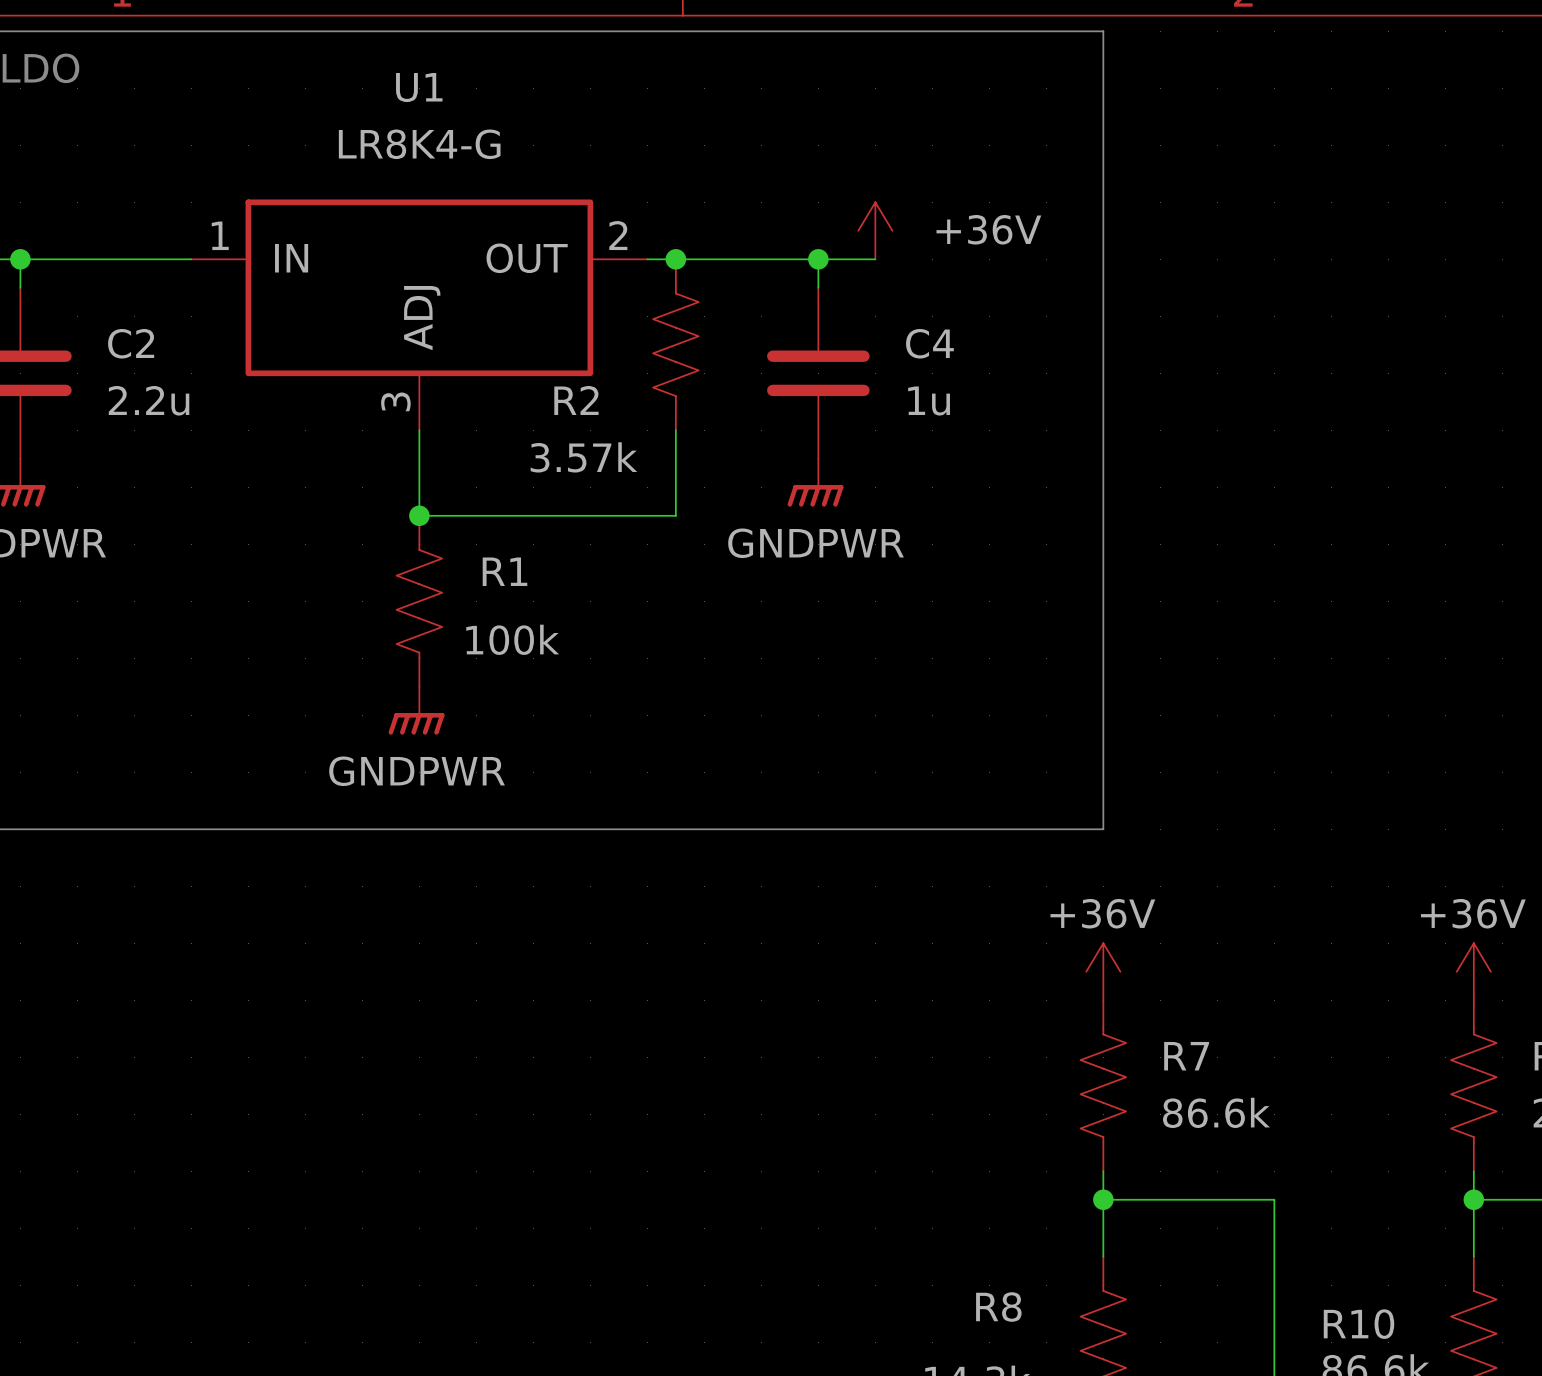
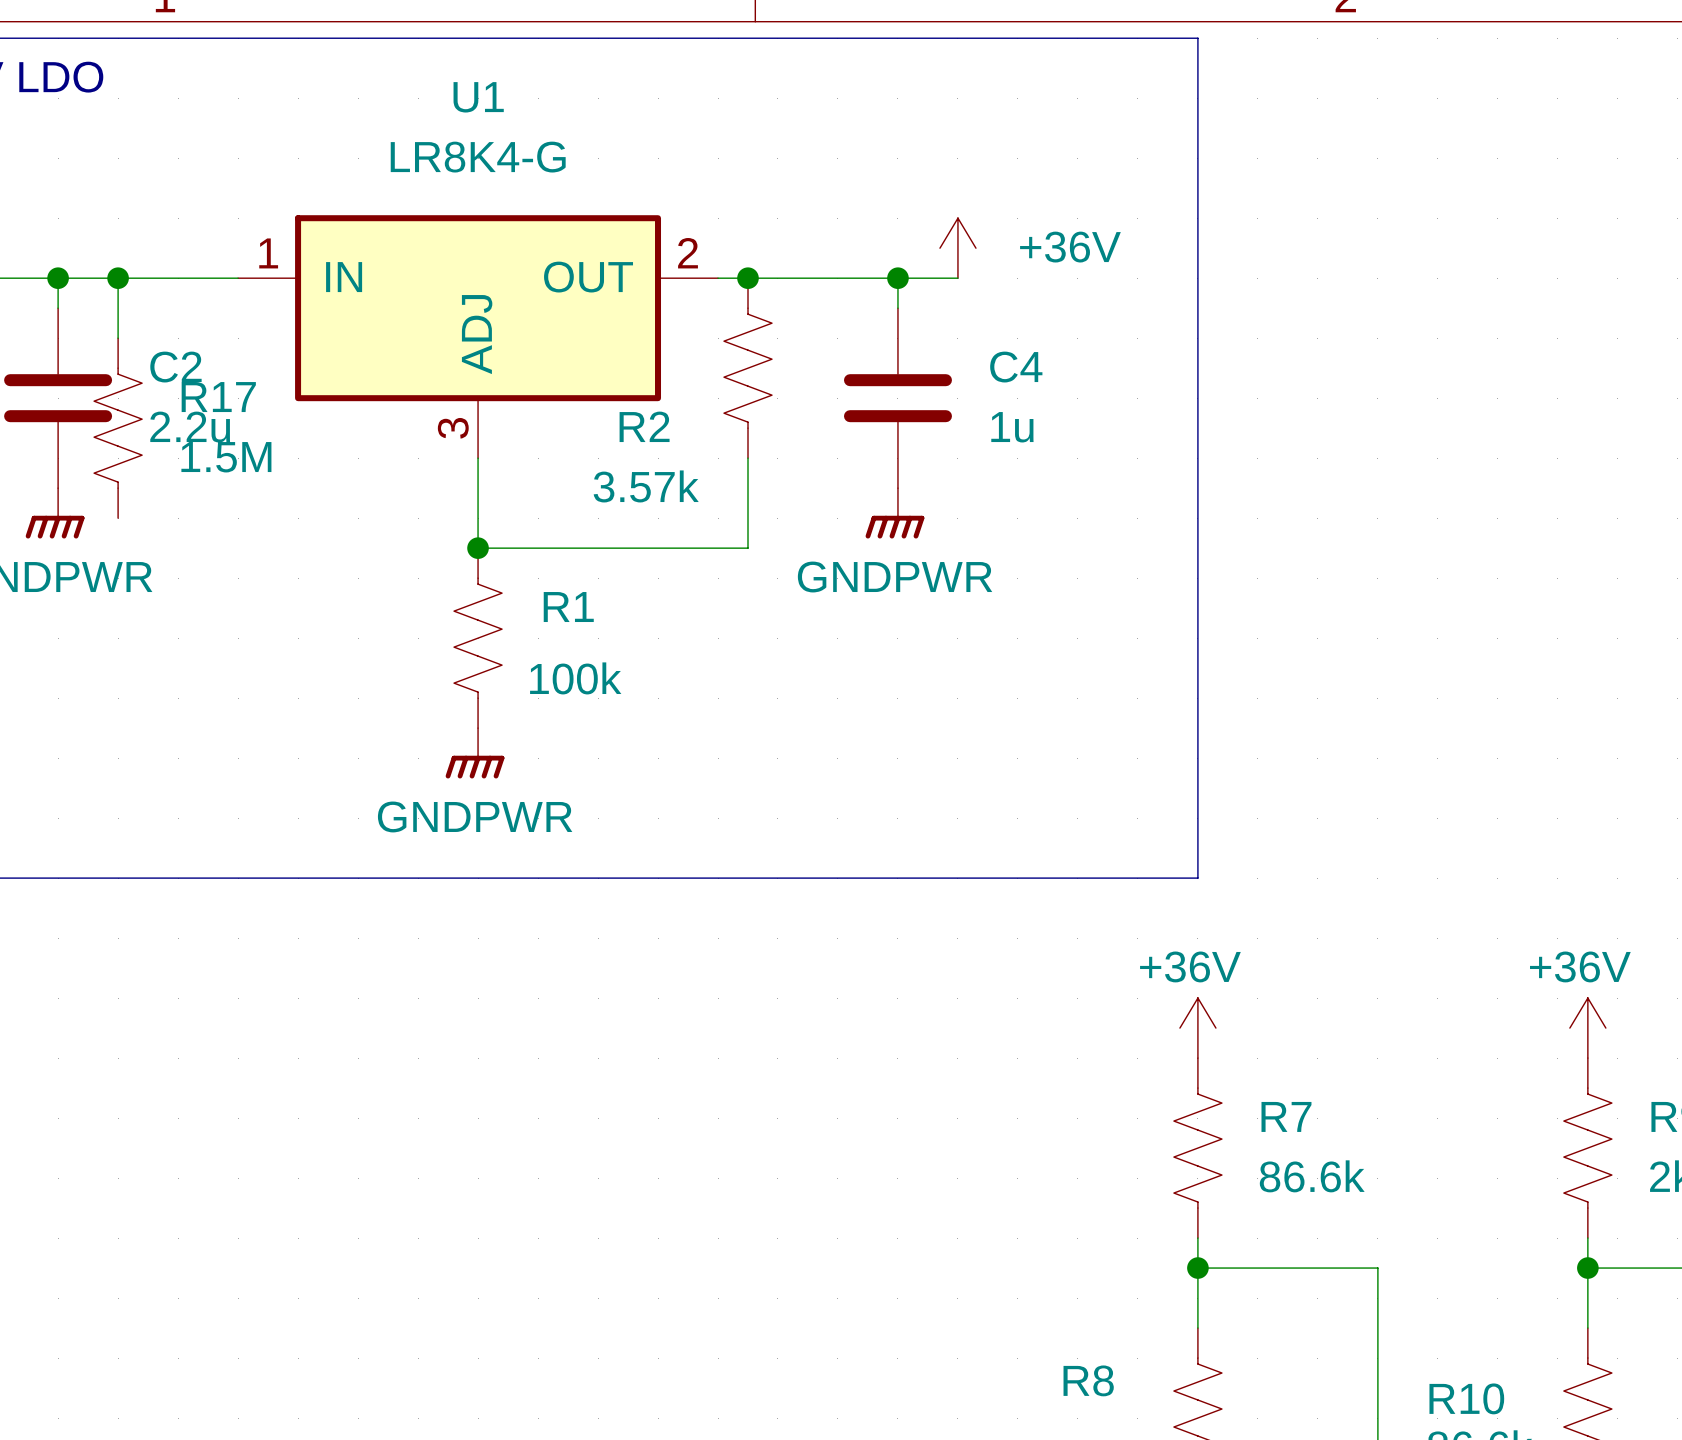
wire: none -> (118, 278) (118, 338)
junction: none -> (118, 278)
R17: none -> 1.5M (118, 428)

